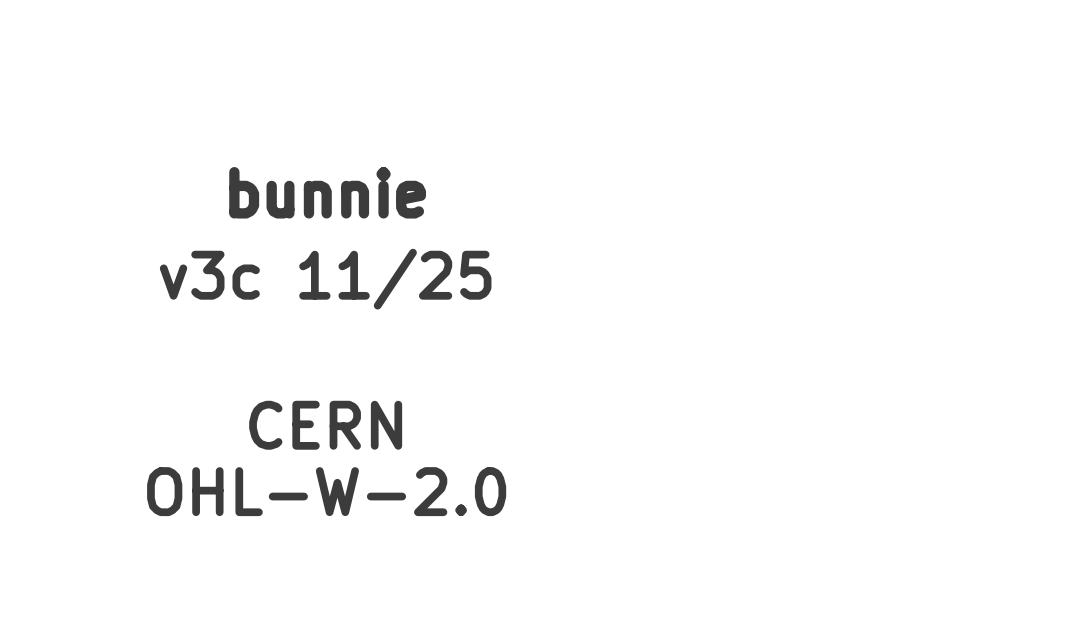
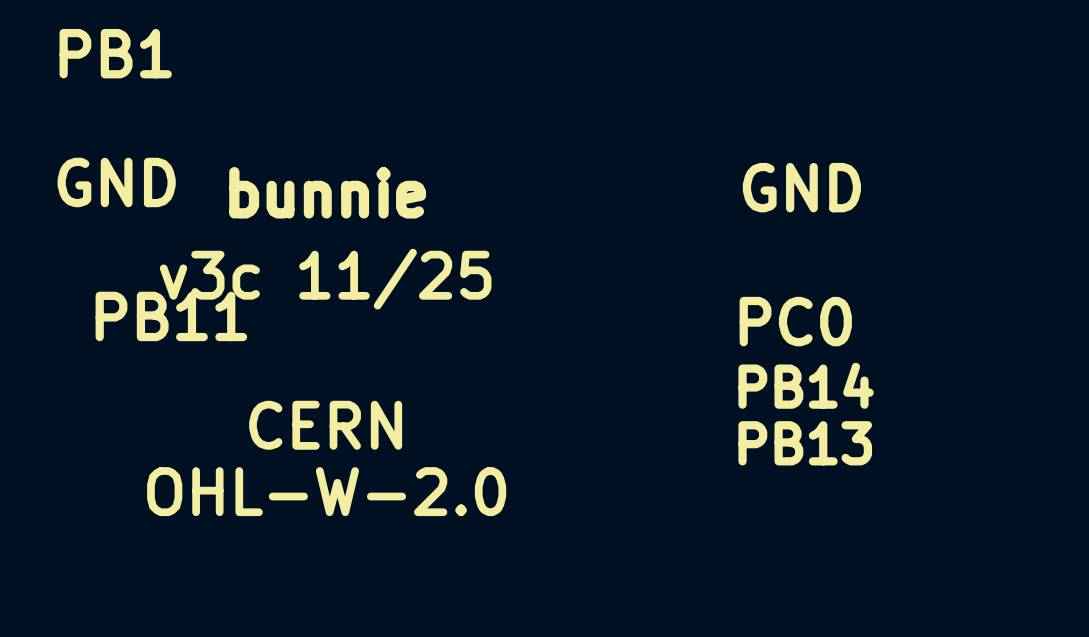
text: none -> PB1 (115, 53)
text: none -> GND (116, 182)
text: none -> GND (801, 187)
text: none -> PB11 (171, 316)
text: none -> PC0 (795, 321)
text: none -> PB14 (806, 385)
text: none -> PB13 (805, 443)

